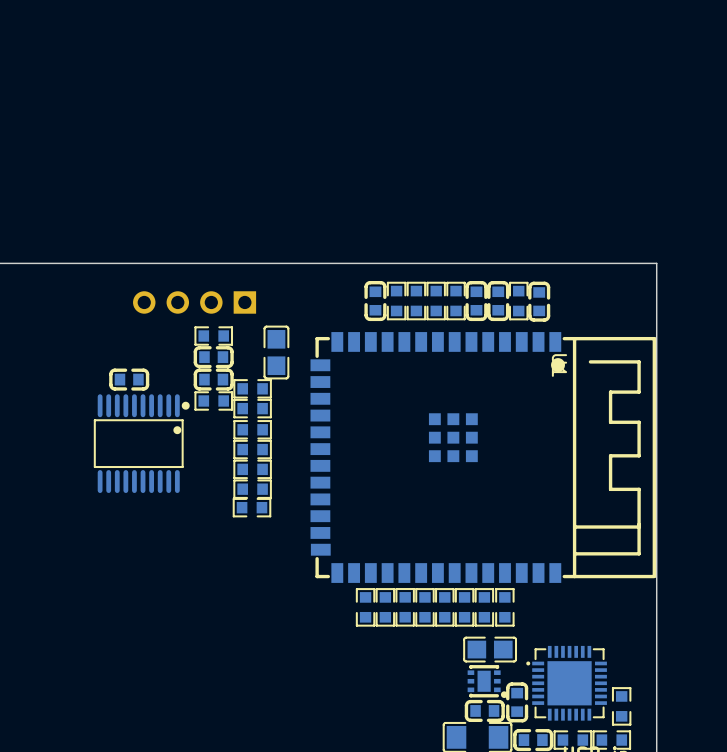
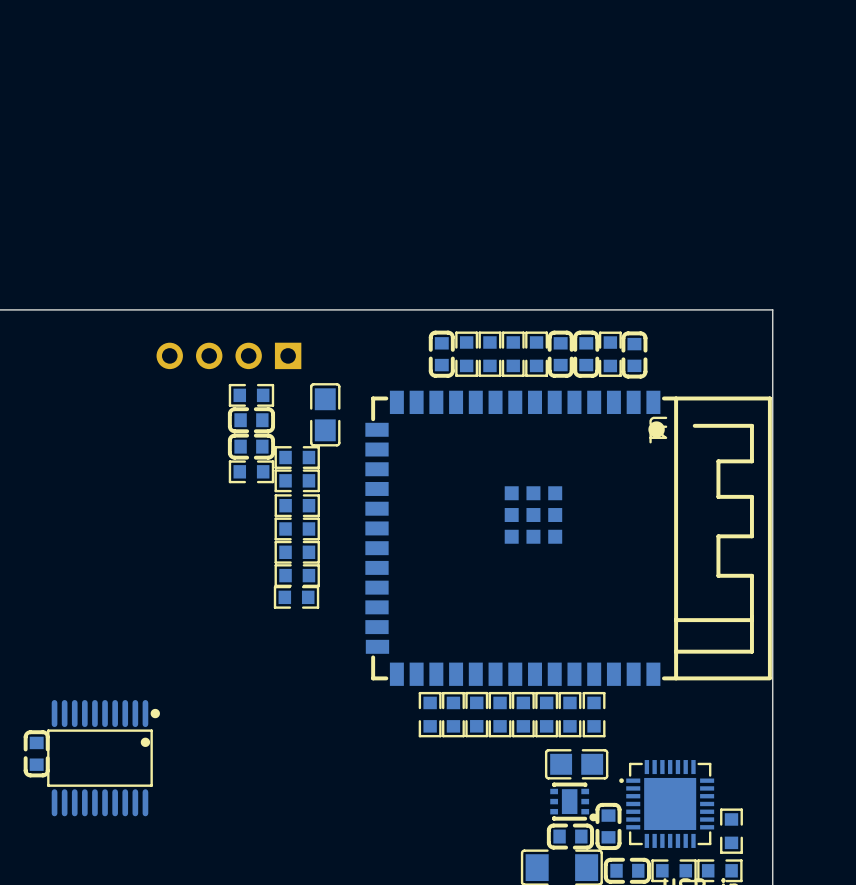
part rotation: 0° (129, 379) -> 90° counterclockwise (36, 753)
part position: (129, 379) -> (36, 753)
part position: (141, 443) -> (103, 758)

